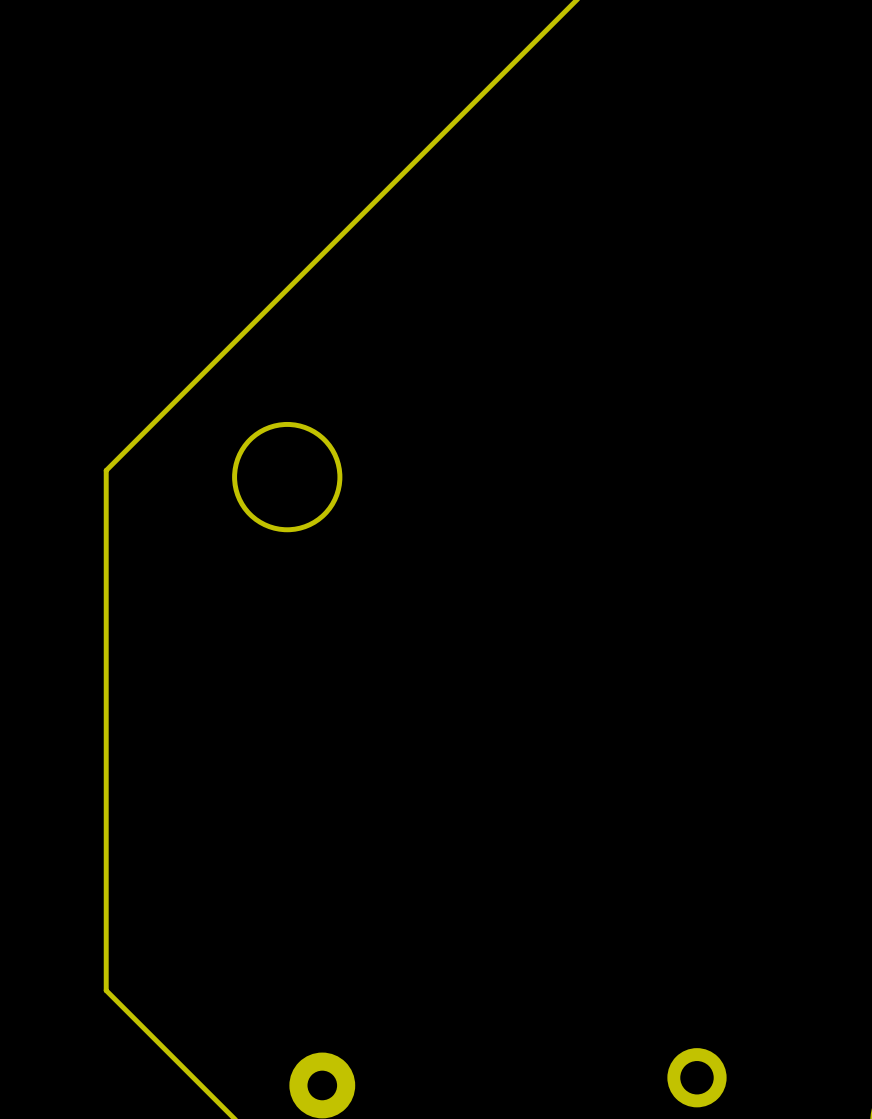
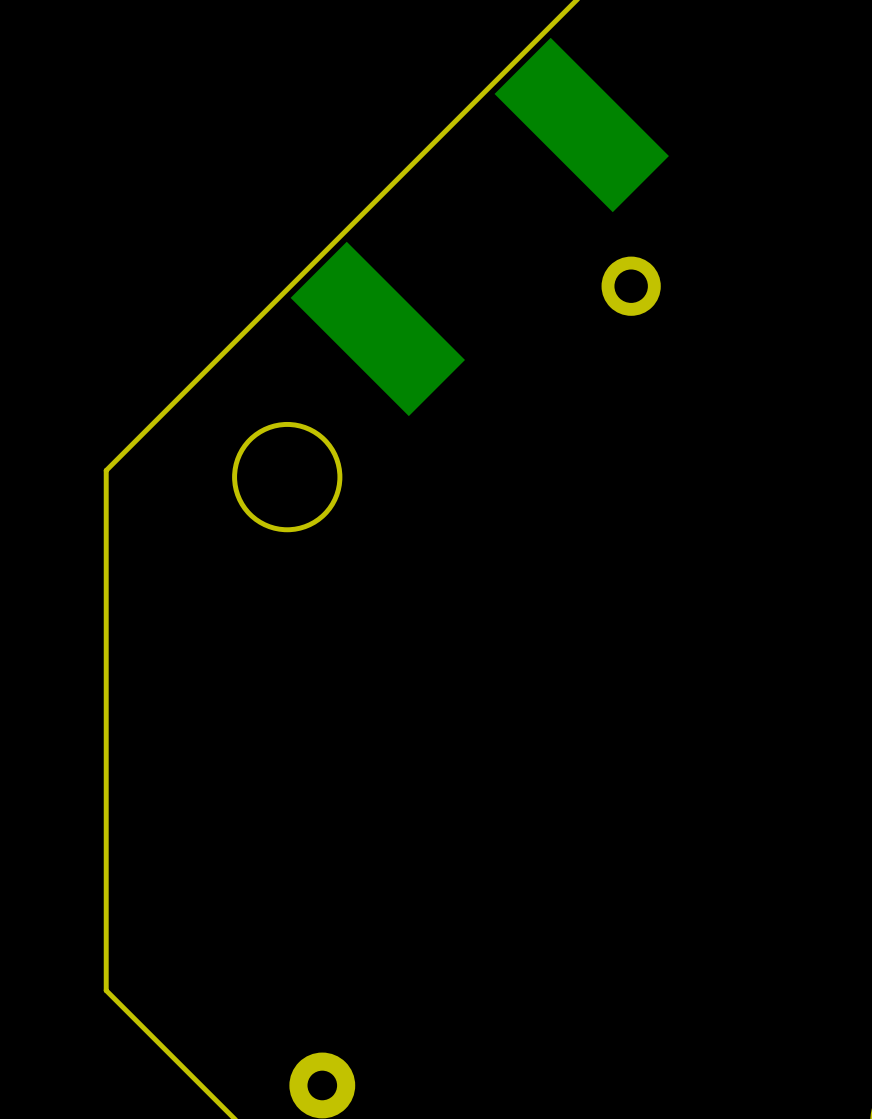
part: none -> (479, 226)
part position: (696, 1077) -> (631, 286)

